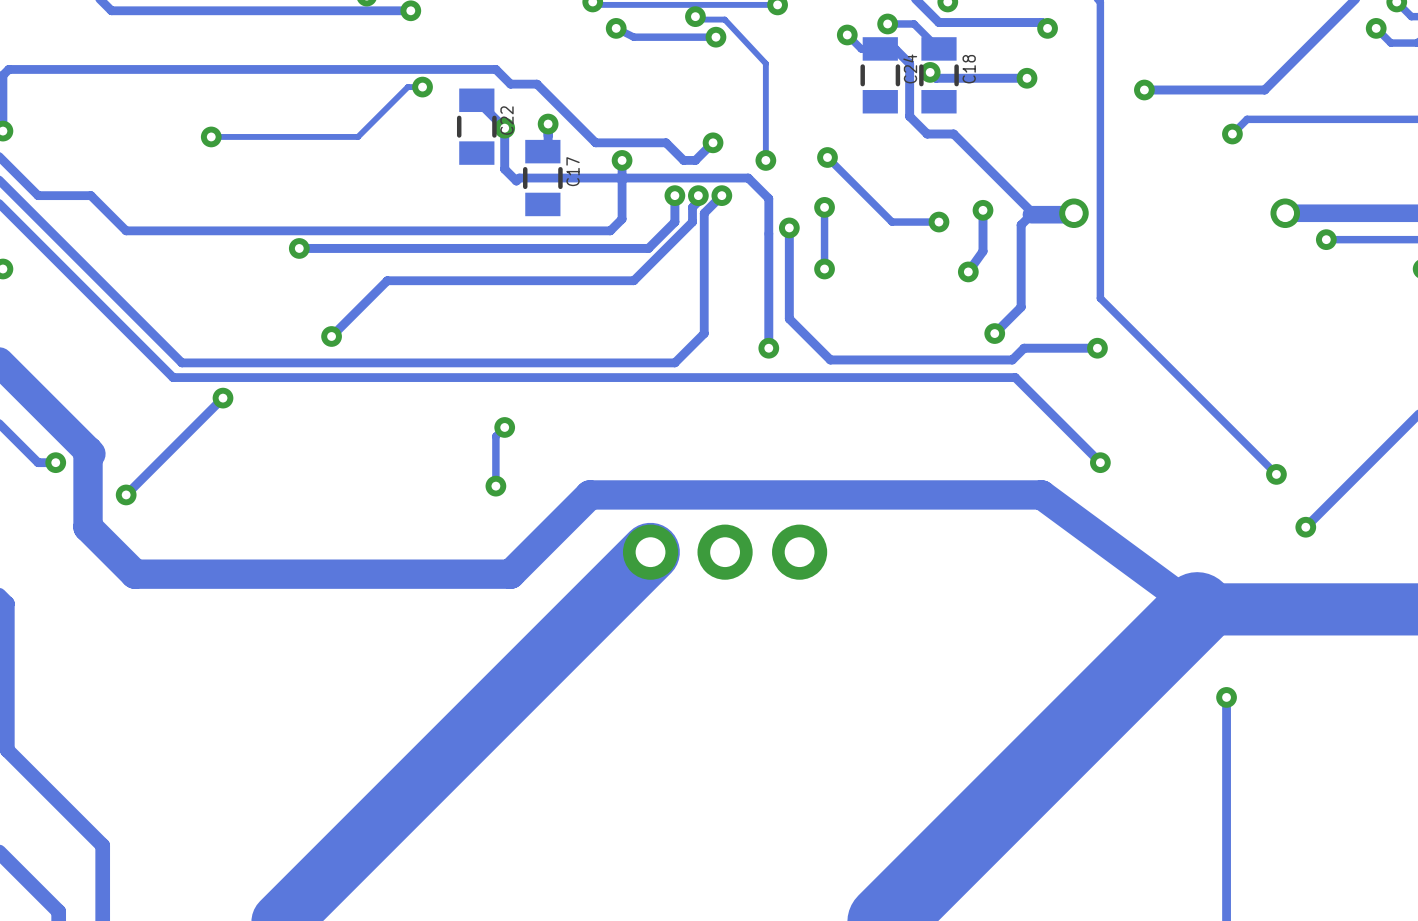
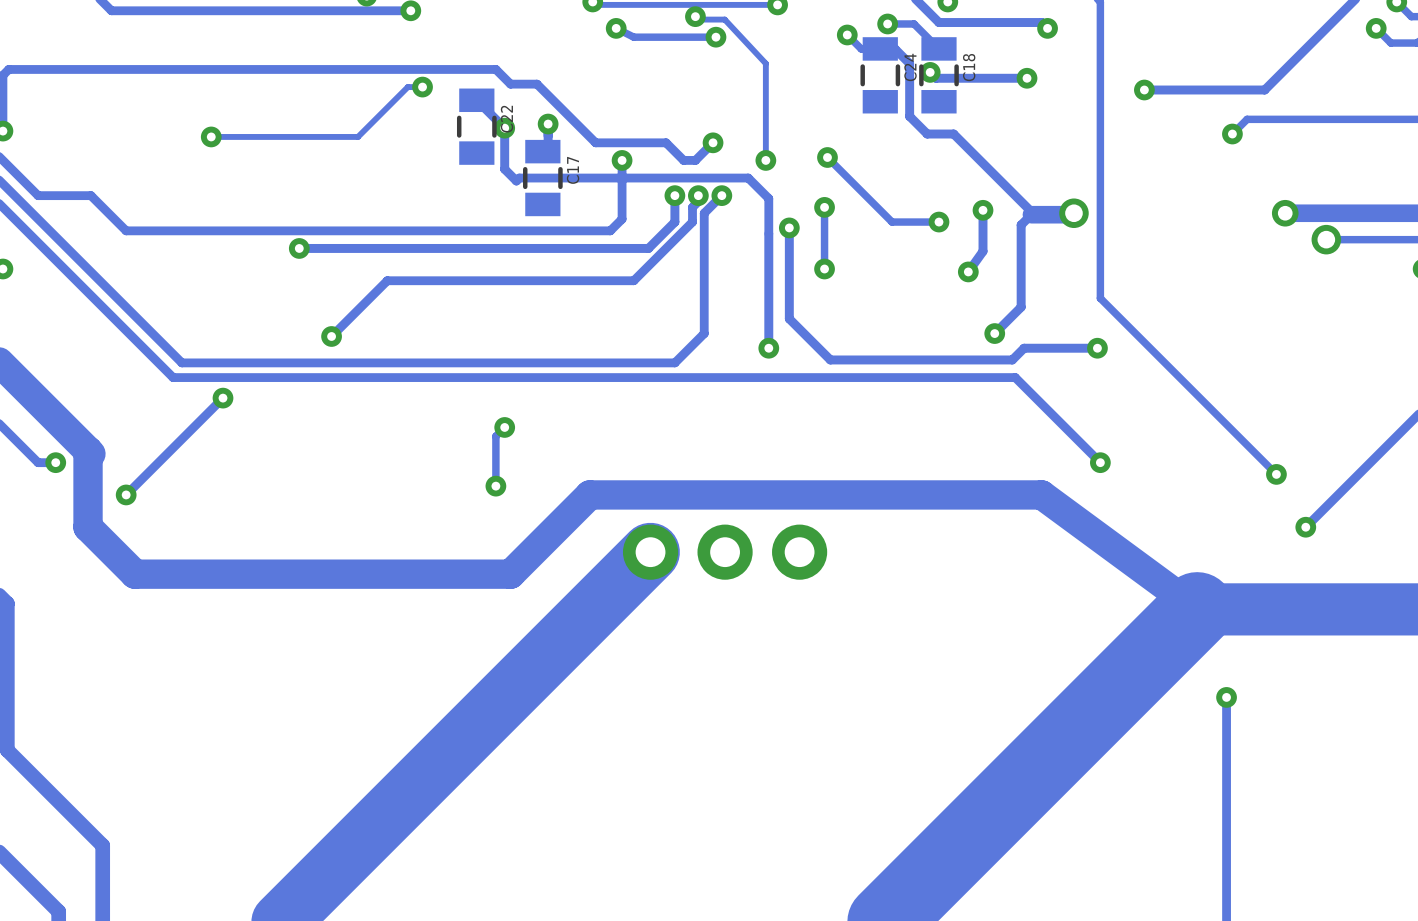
via position: (1285, 213) -> (1326, 239)
via: none -> (1285, 213)
via: (1326, 239) -> none

